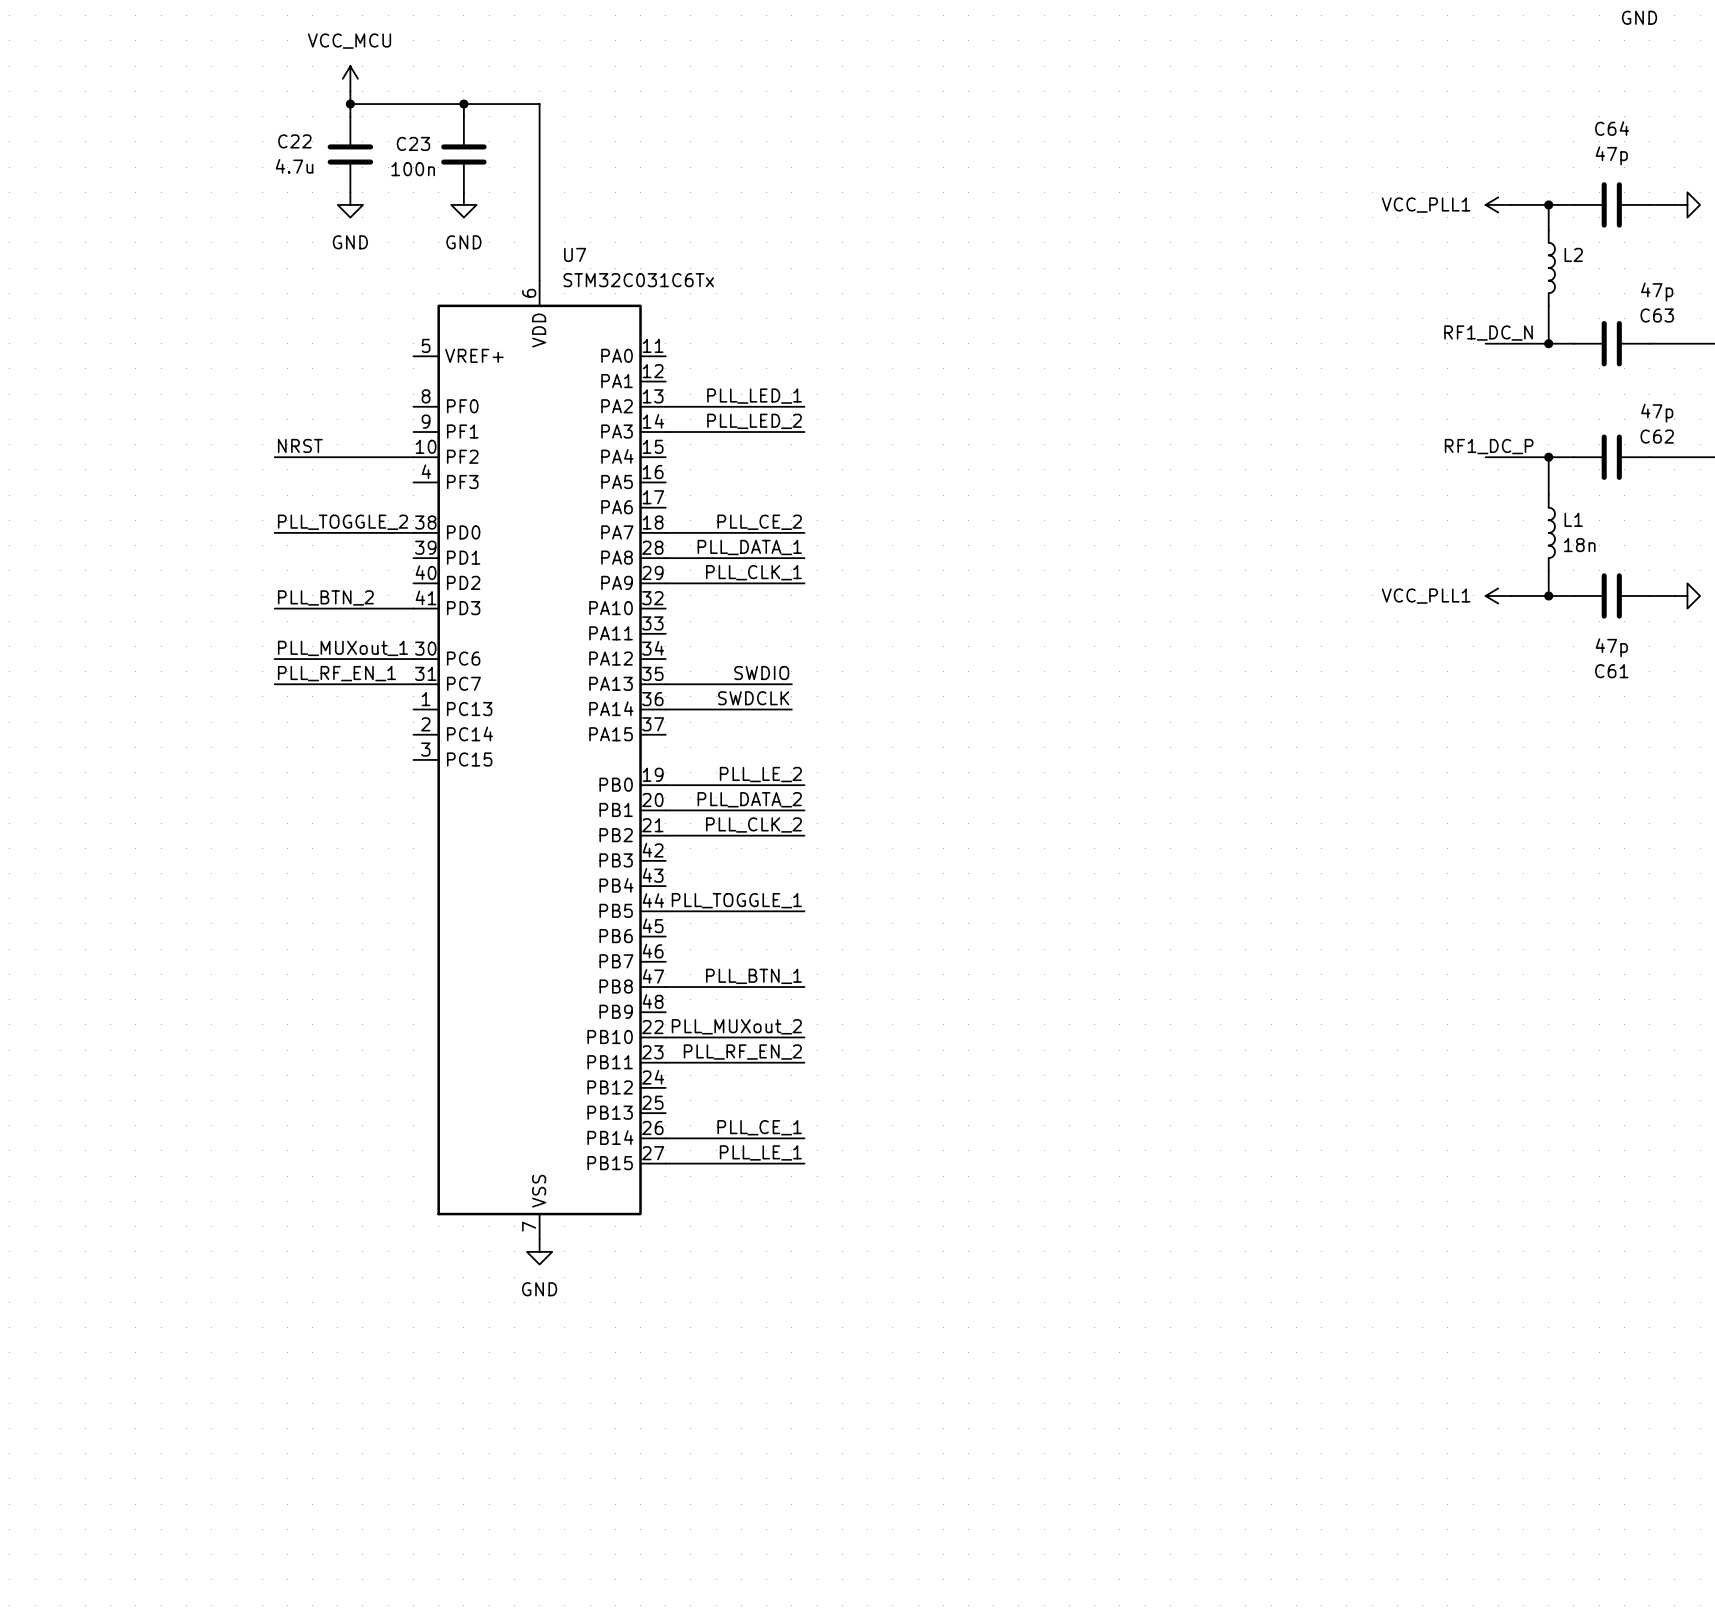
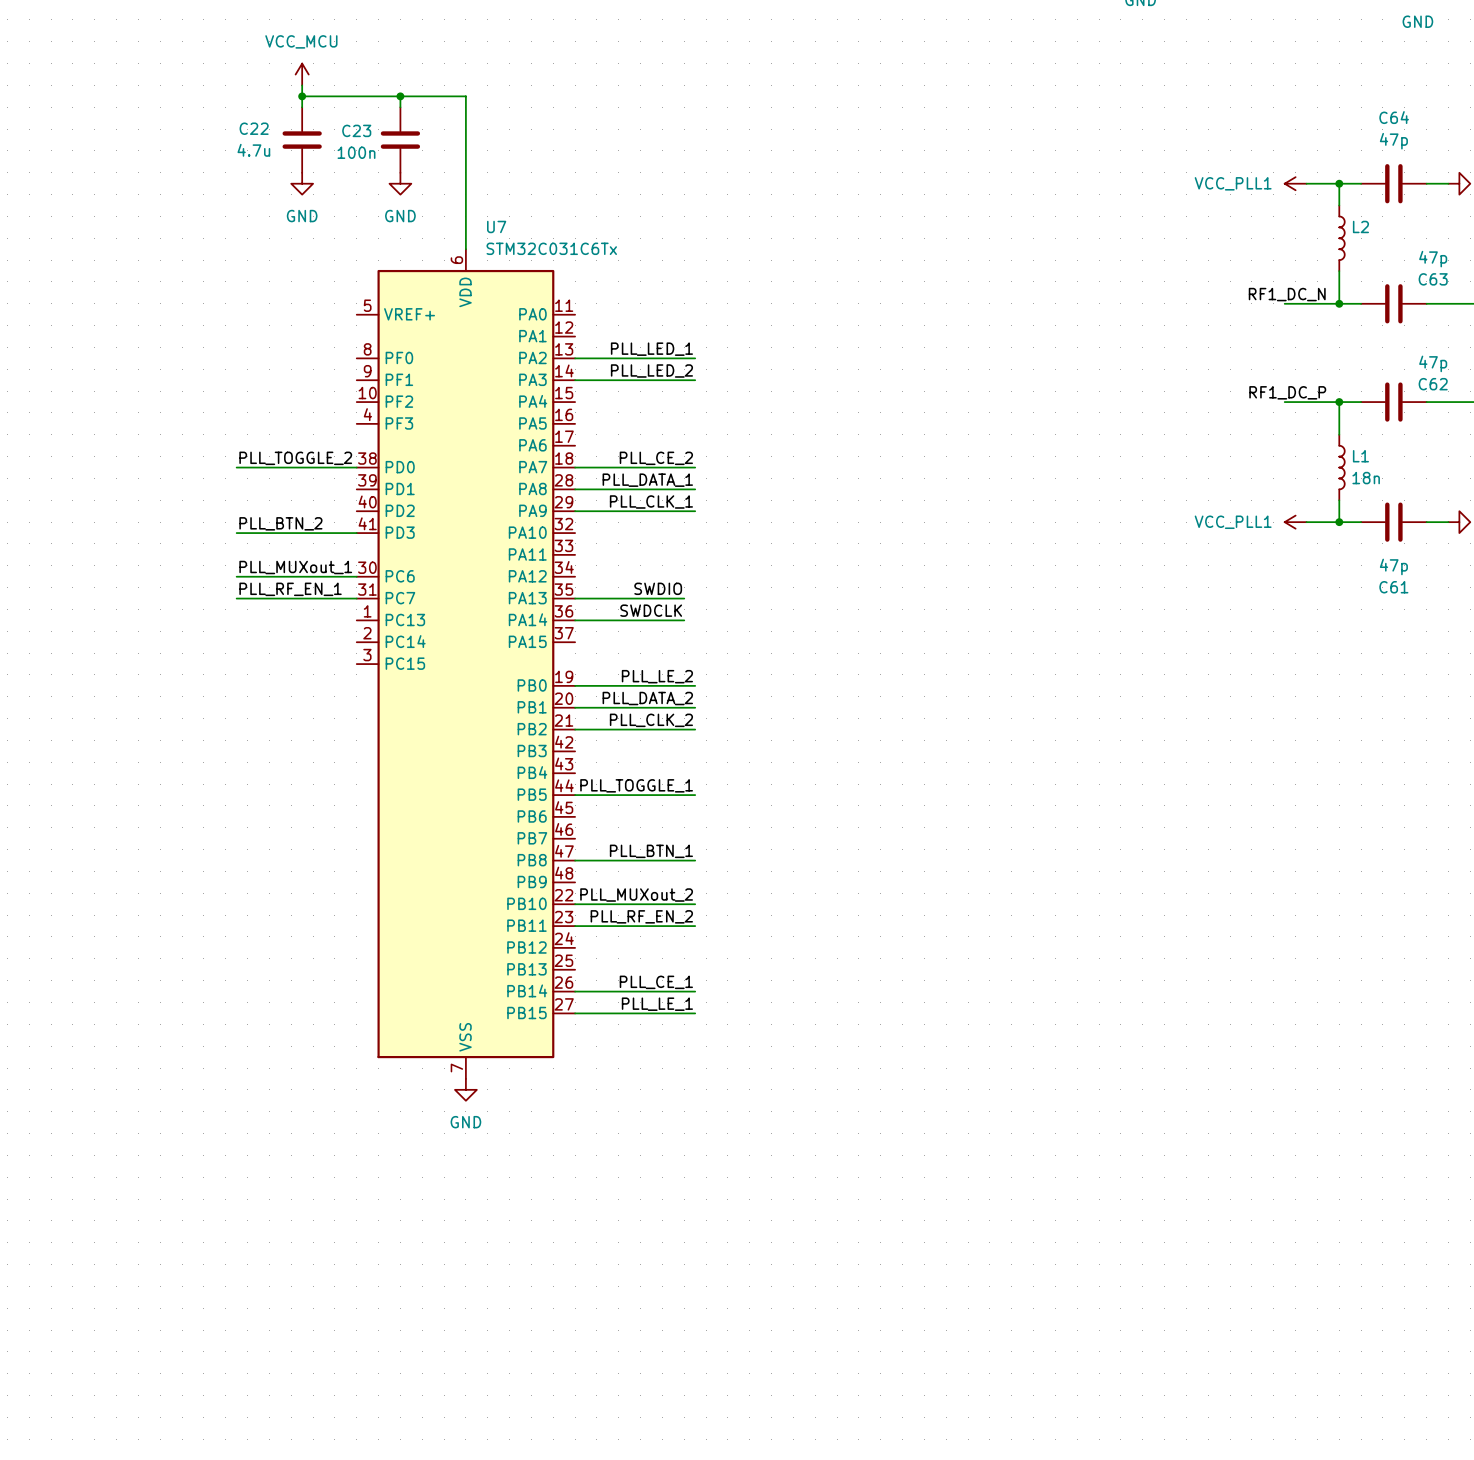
label: NRST (300, 445) -> none
wire: (274, 457) (413, 457) -> none

